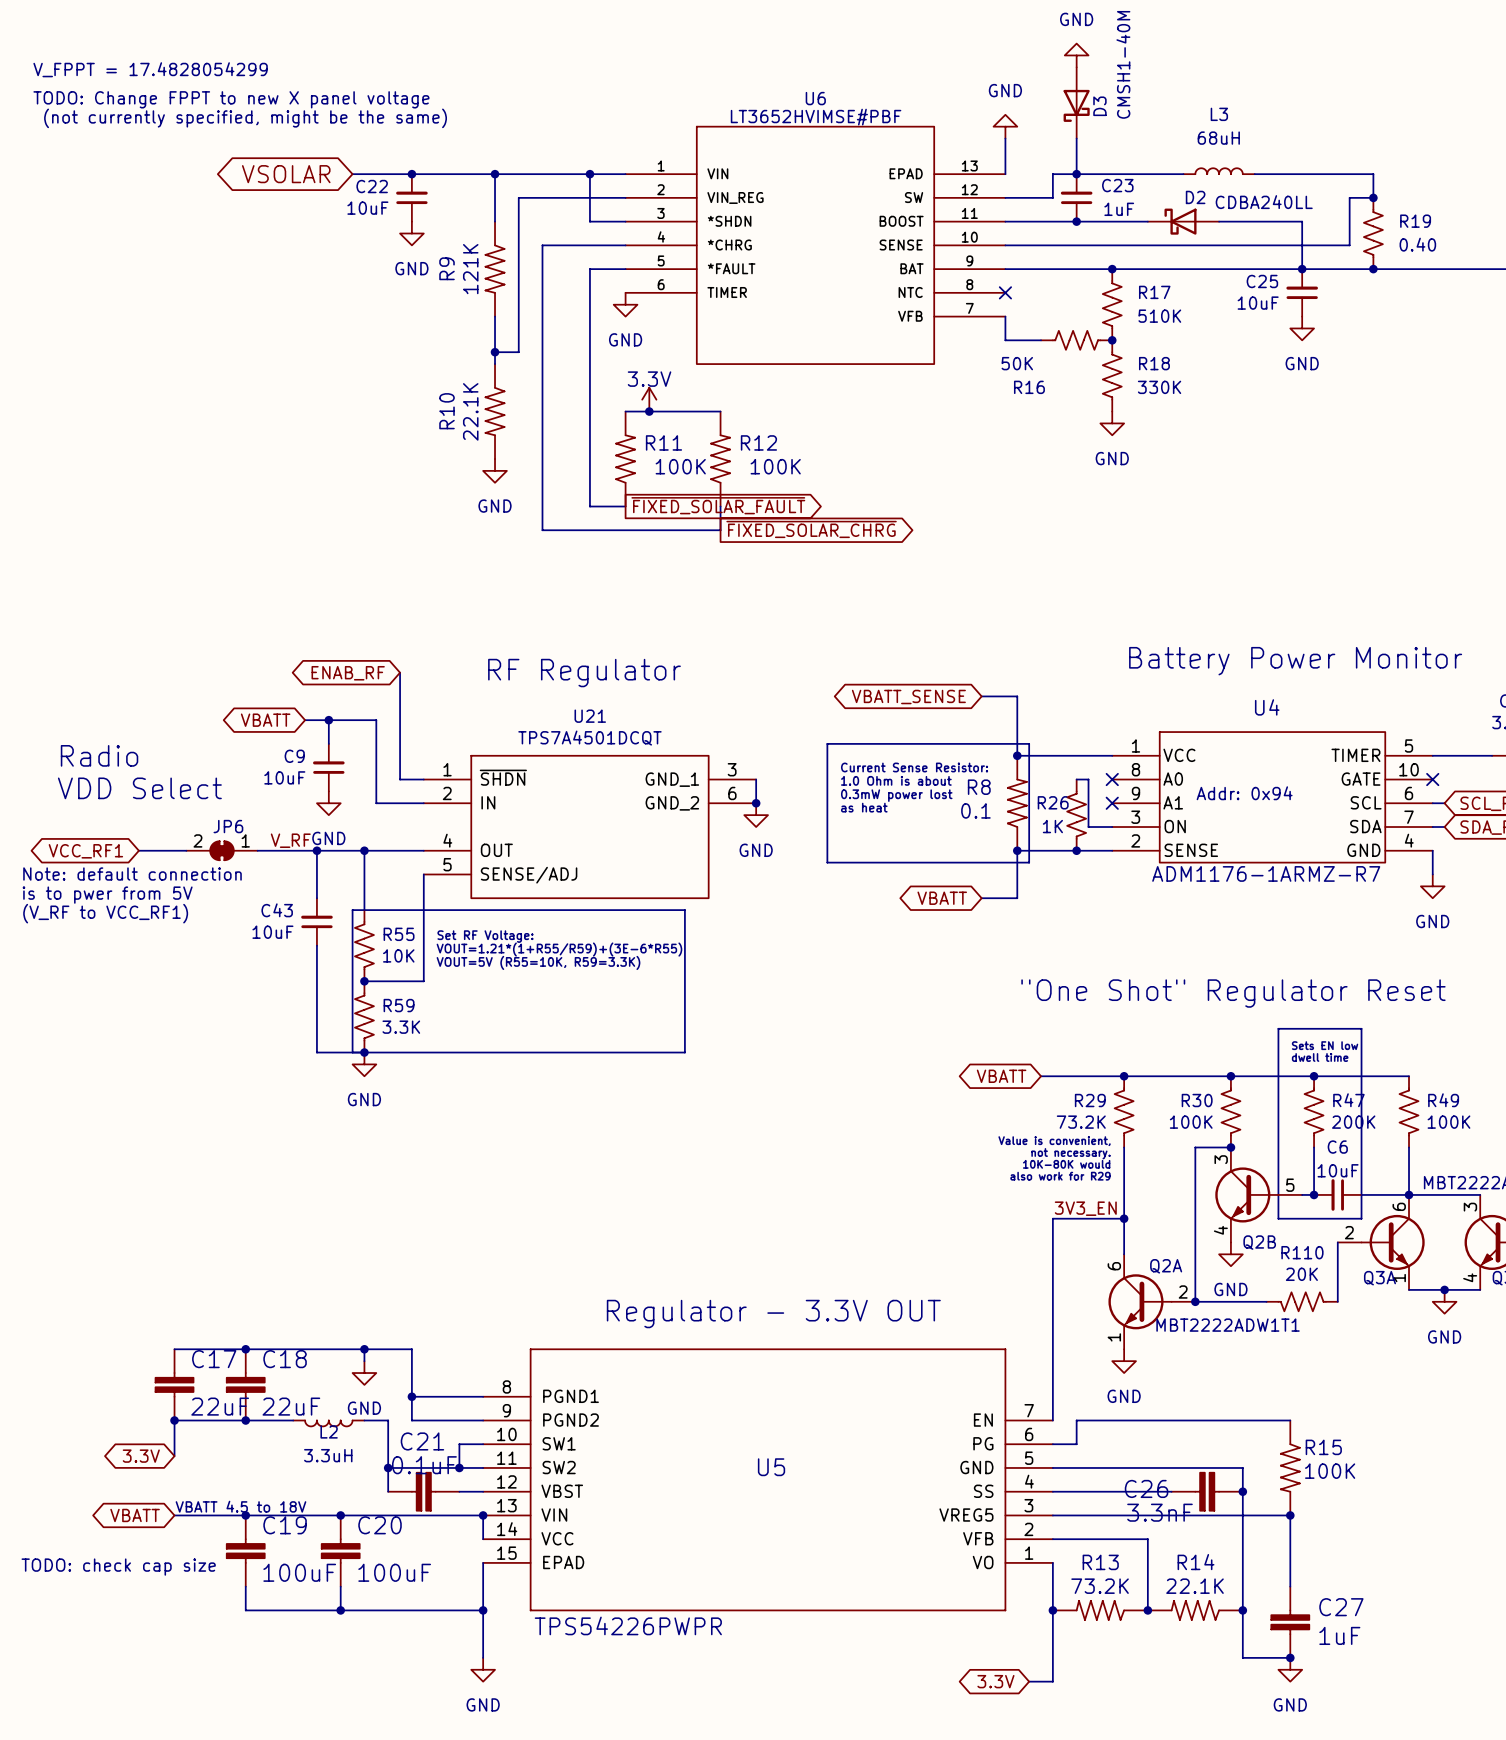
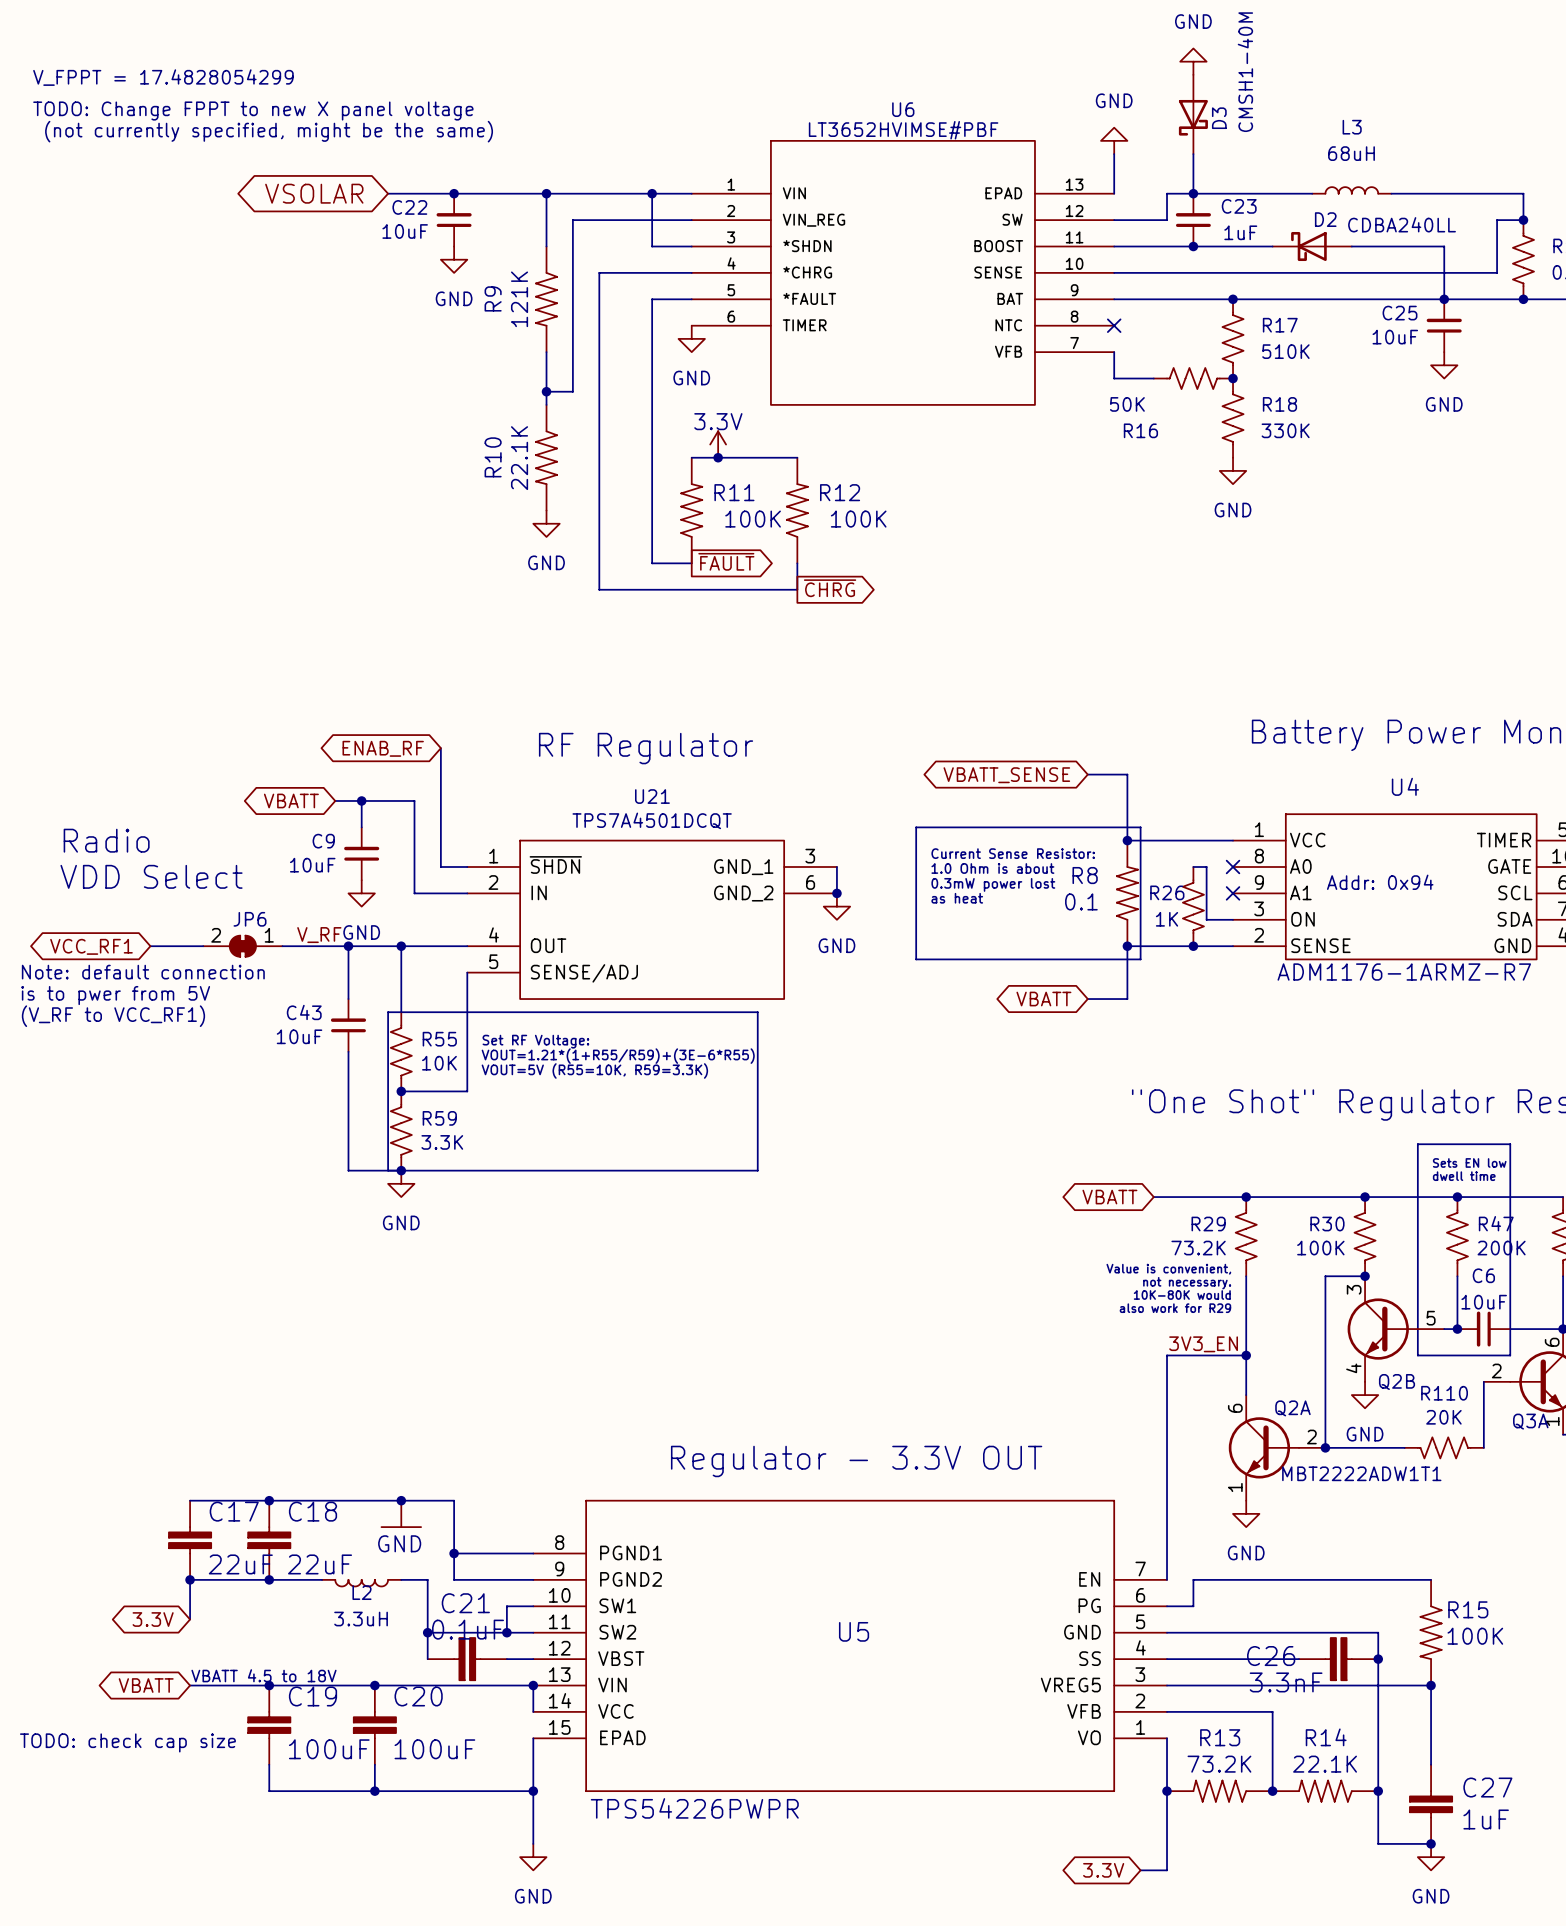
global label: ~{FIXED_SOLAR_FAULT} (718, 505) -> ~{FAULT} (726, 561)
global label: ~{FIXED_SOLAR_CHRG} (811, 529) -> ~{CHRG} (830, 588)
power symbol: none -> GND (401, 1513)
power symbol: GND (364, 1373) -> none

